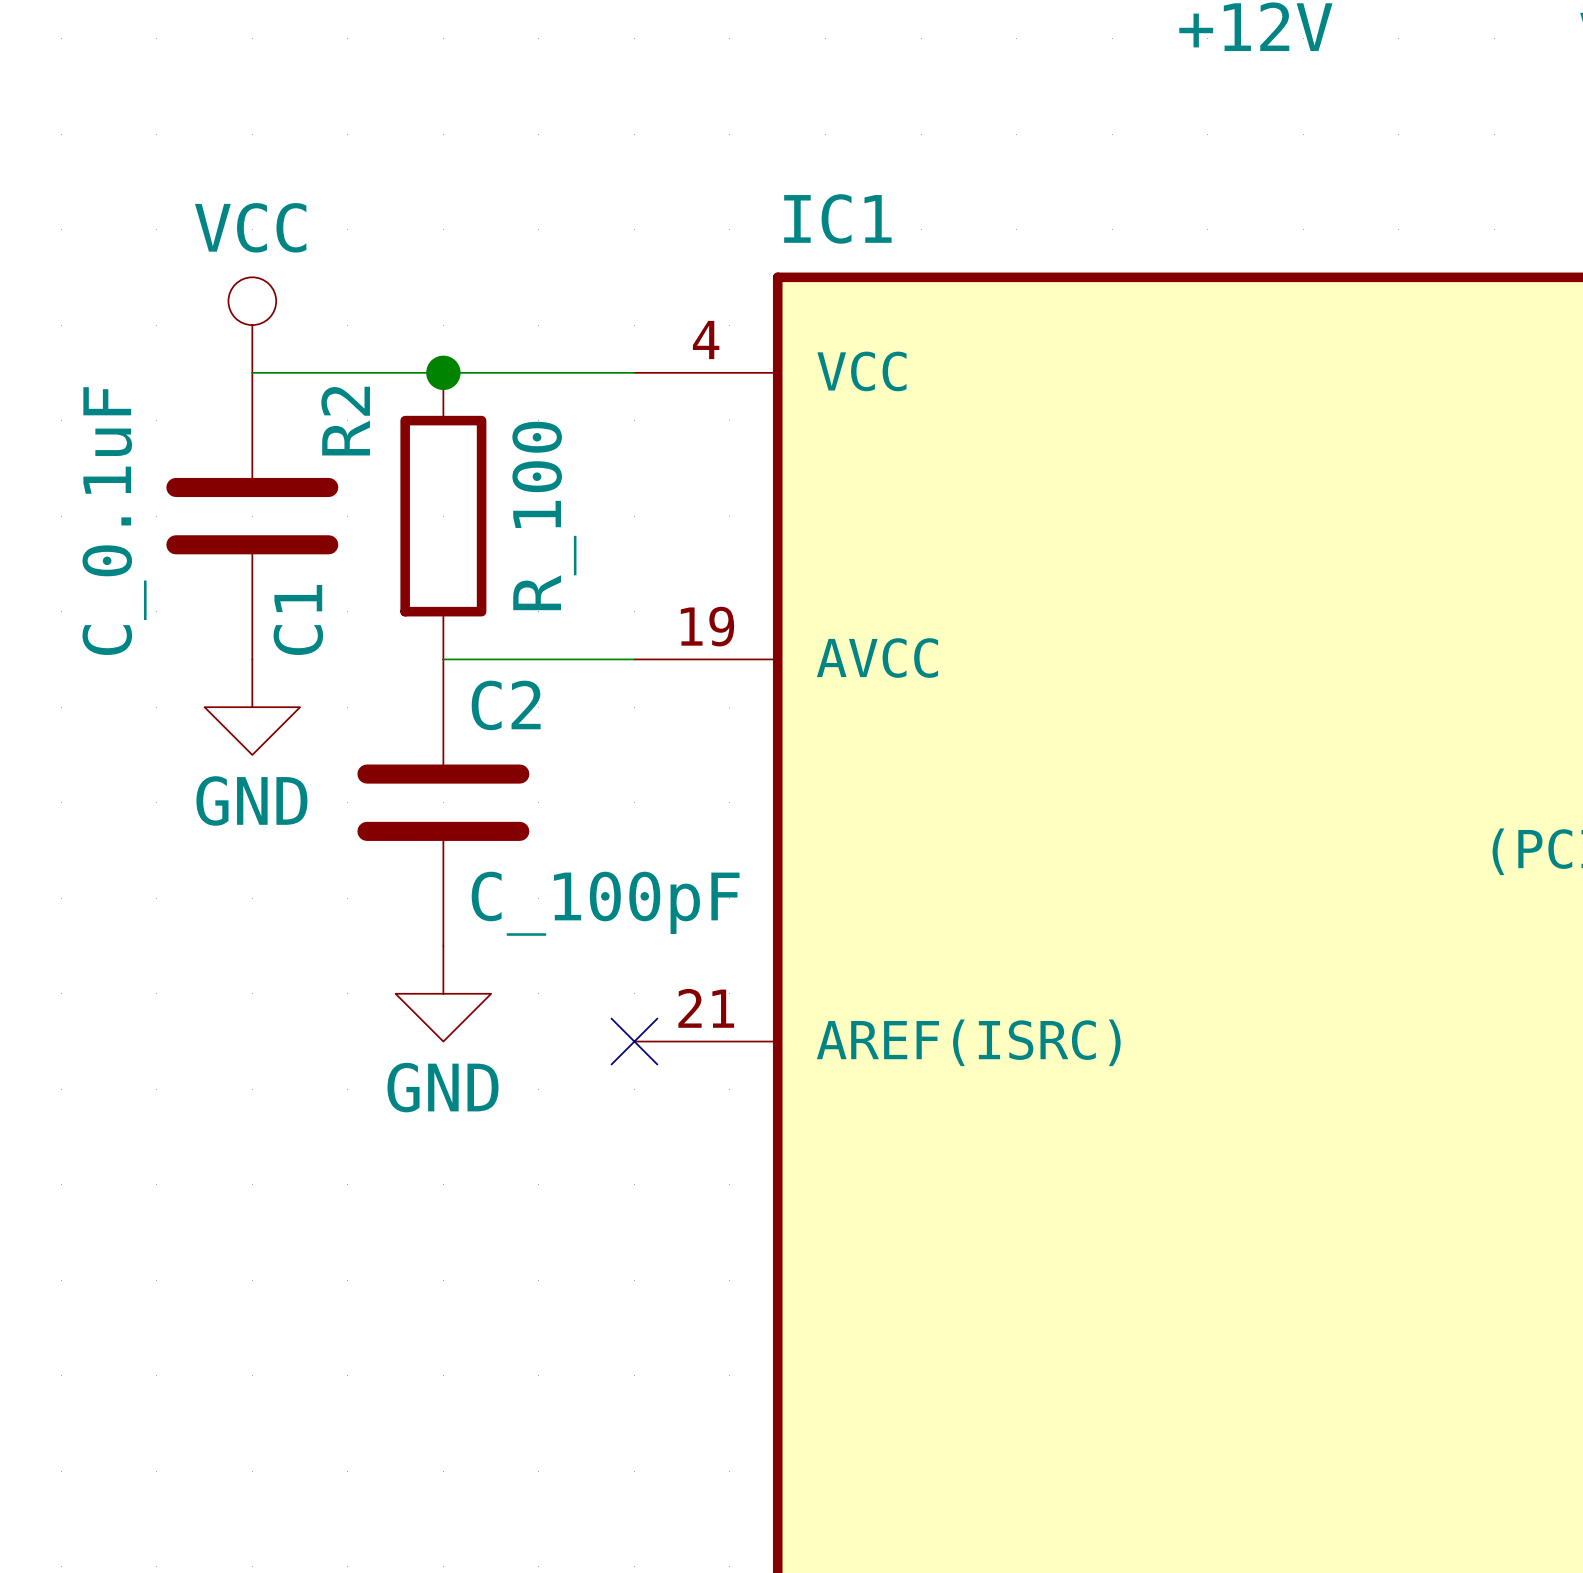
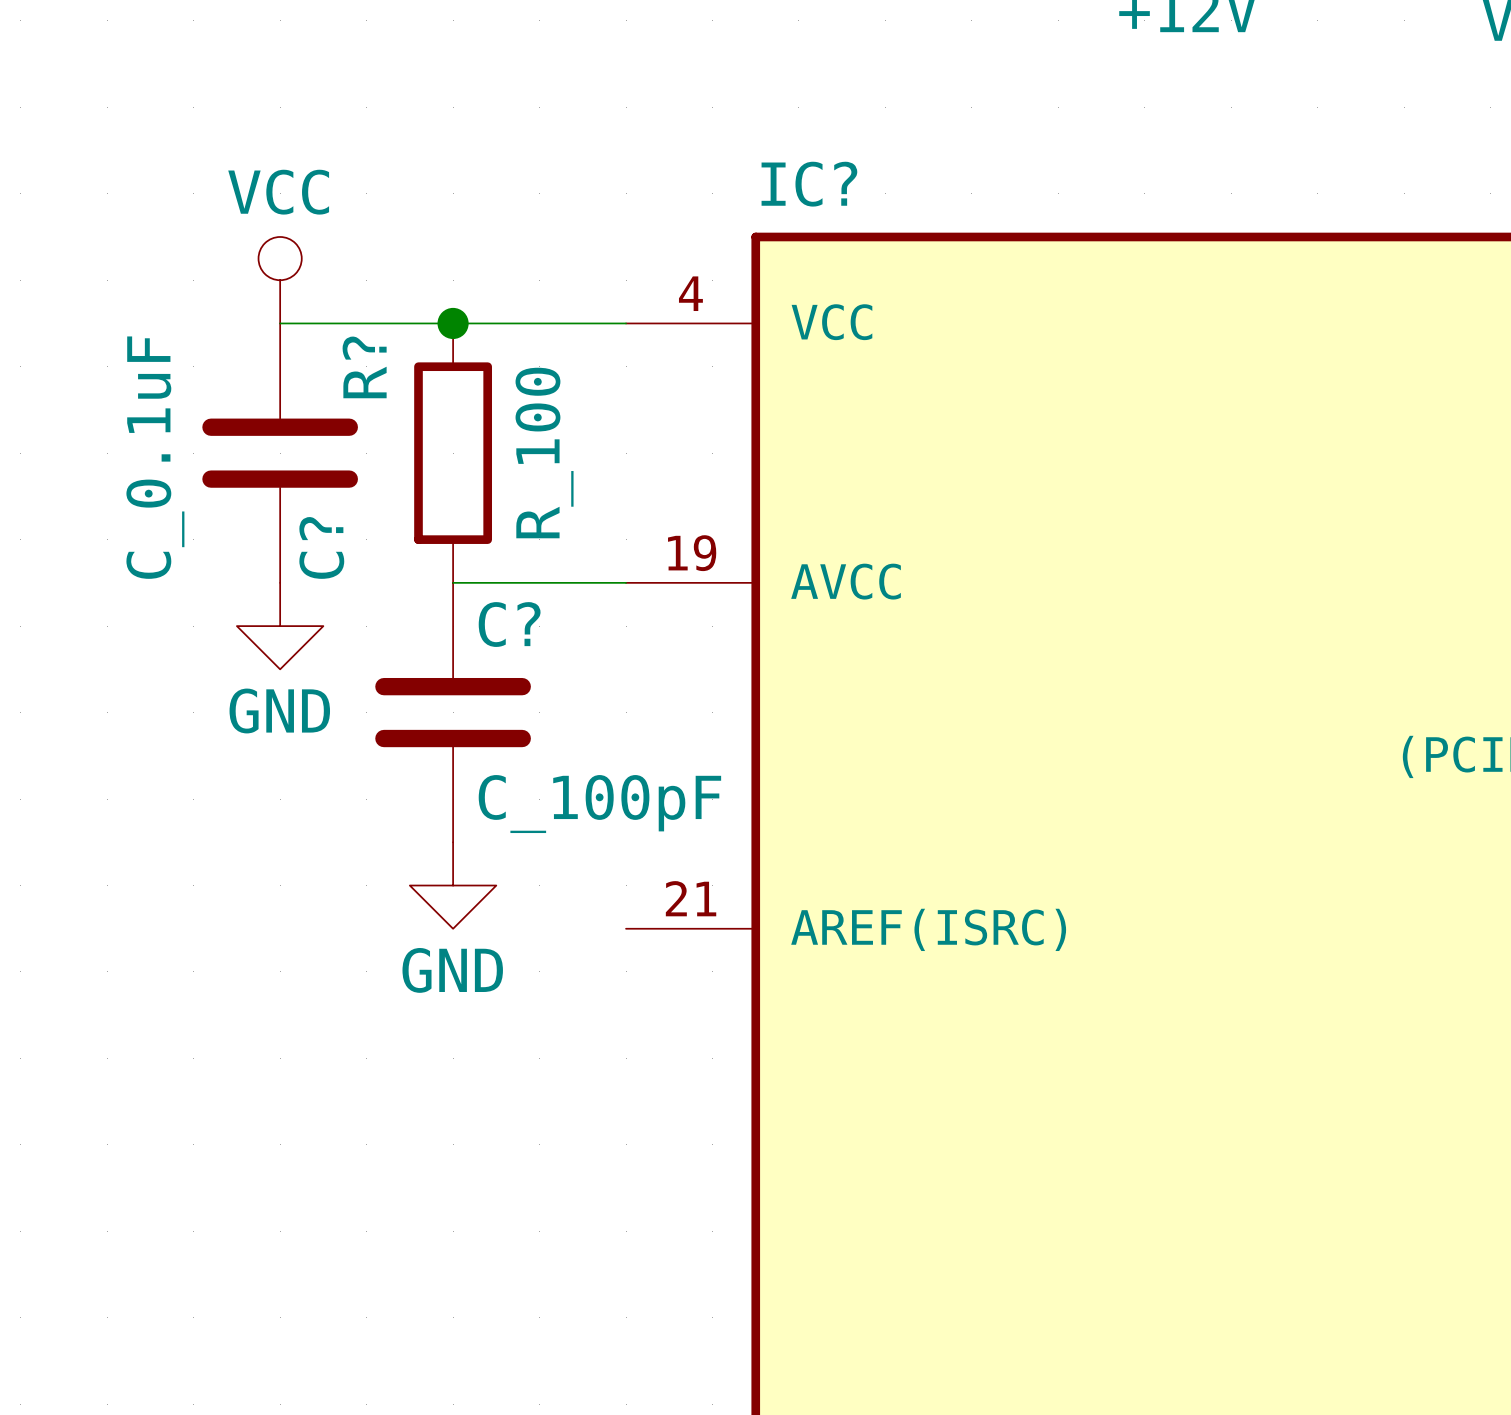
IC1 name: IC1 (837, 218) -> IC? (809, 184)
R2 name: R2 (345, 421) -> R? (364, 367)
C1 name: C1 (298, 619) -> C? (321, 547)
C2 name: C2 (506, 705) -> C? (509, 624)
no-connect mark: (634, 1041) -> none

